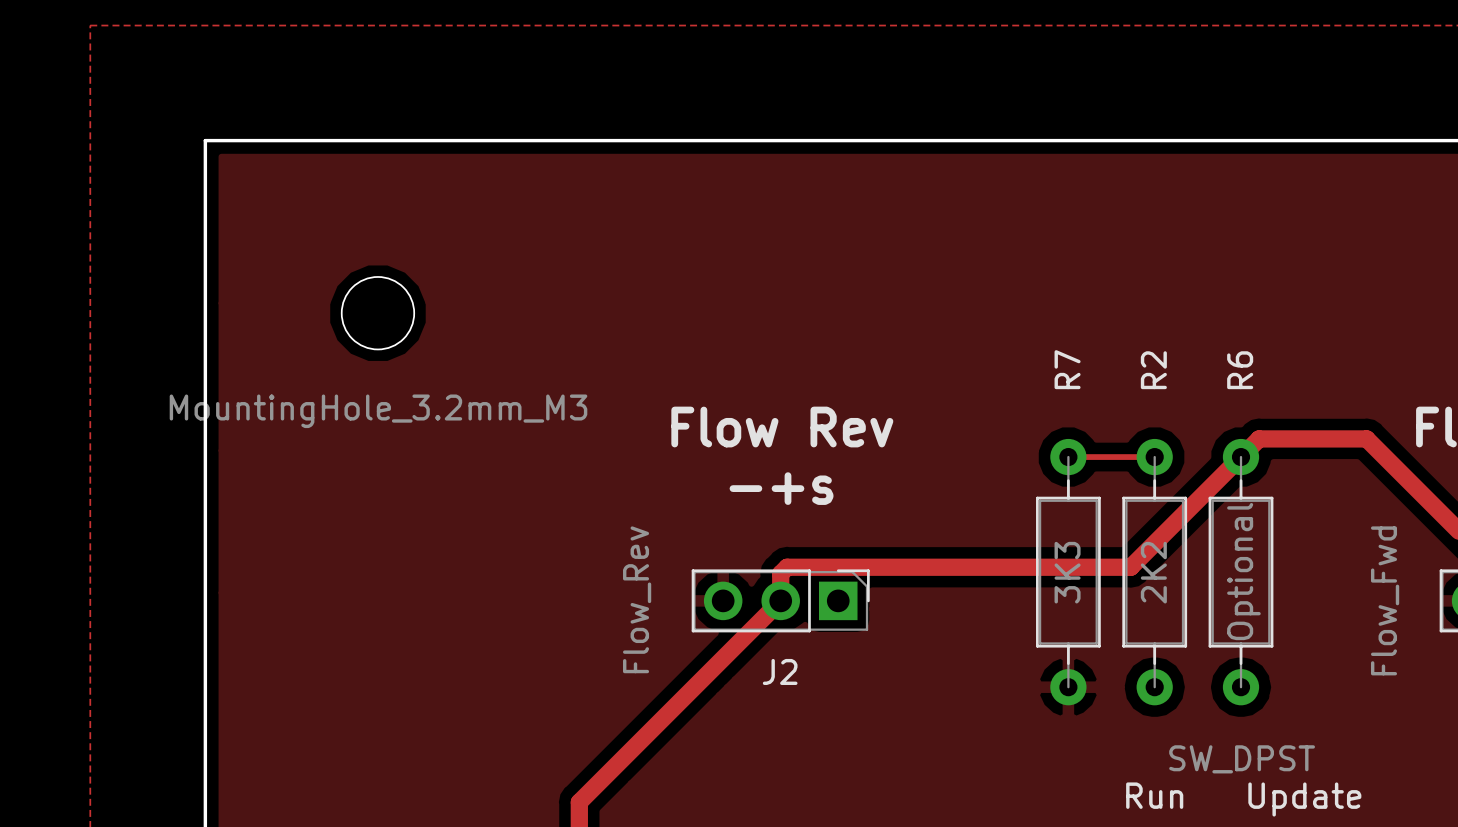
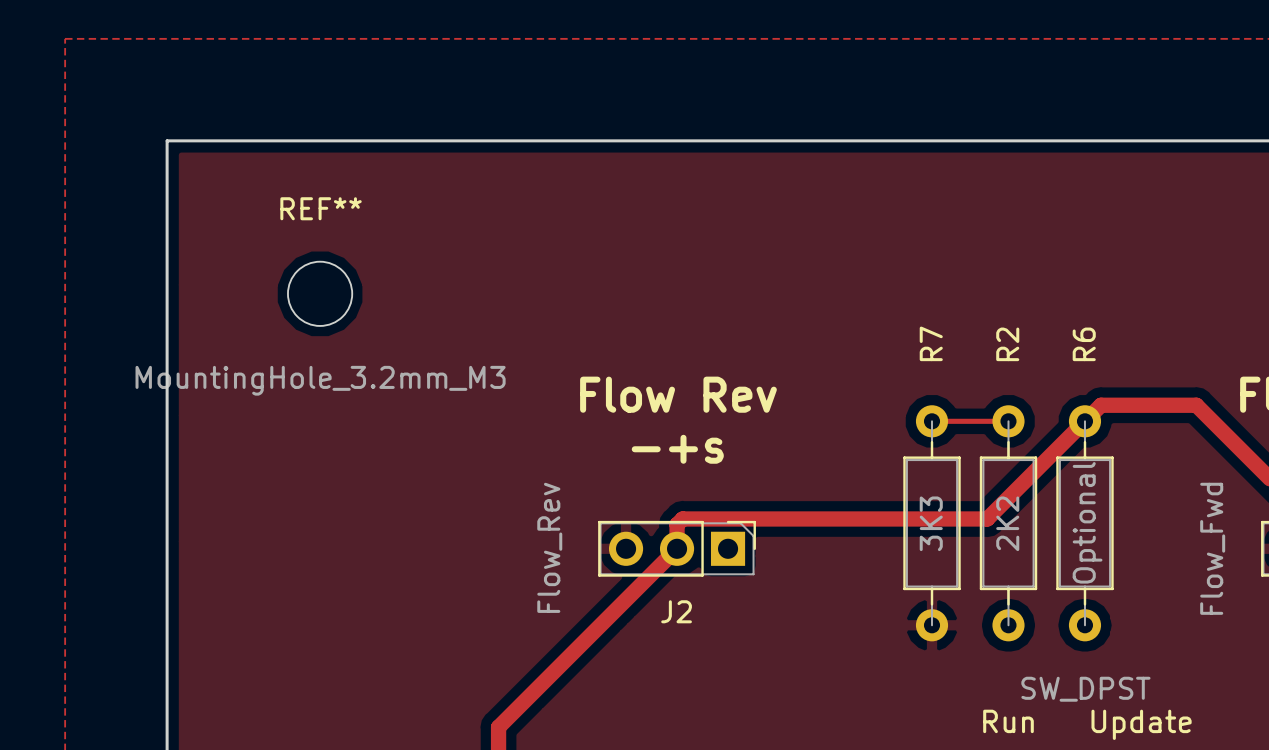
REF** name: none -> REF** (321, 208)

